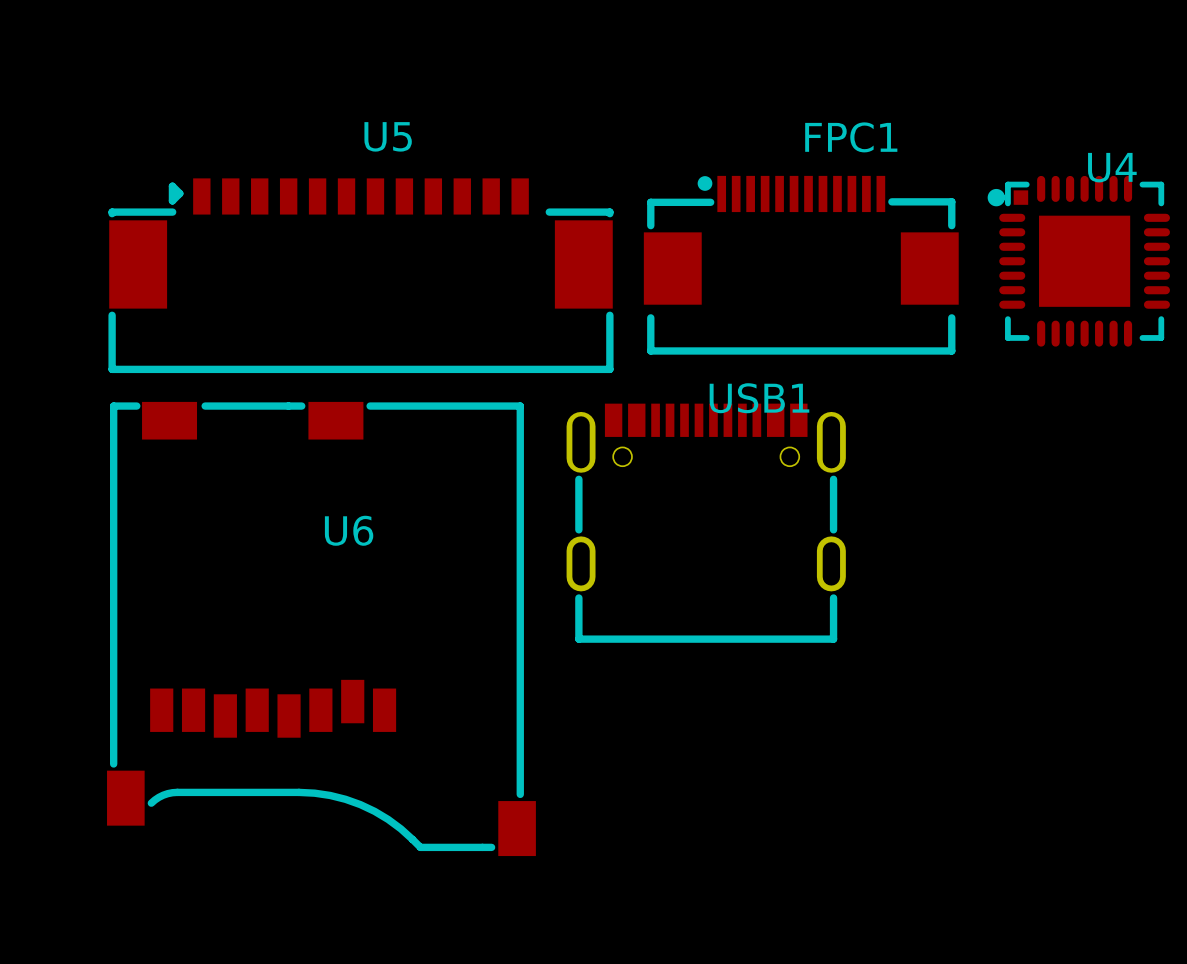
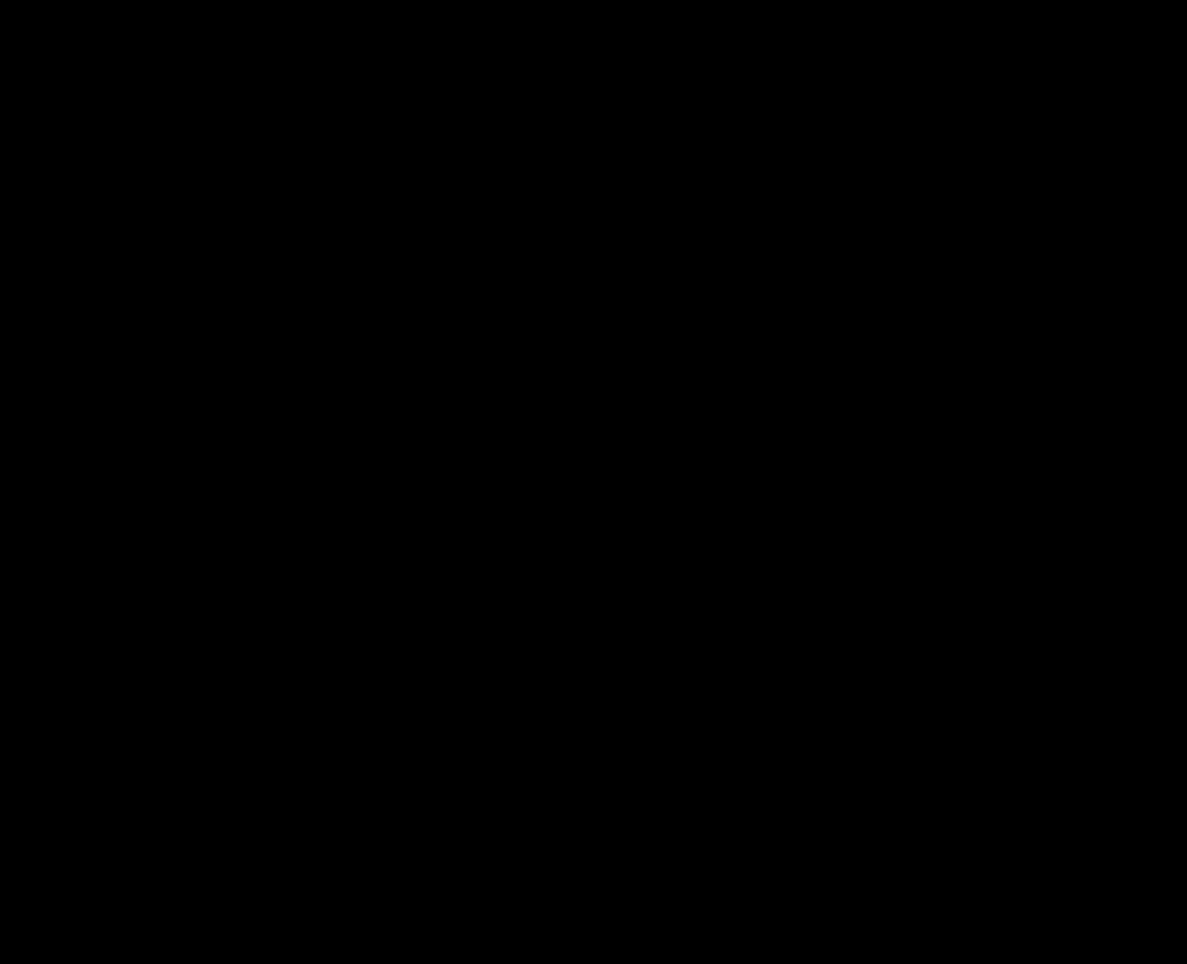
U4: (1078, 261) -> none
FPC1: (801, 265) -> none
U5: (360, 275) -> none
USB1: (706, 523) -> none
U6: (321, 628) -> none

